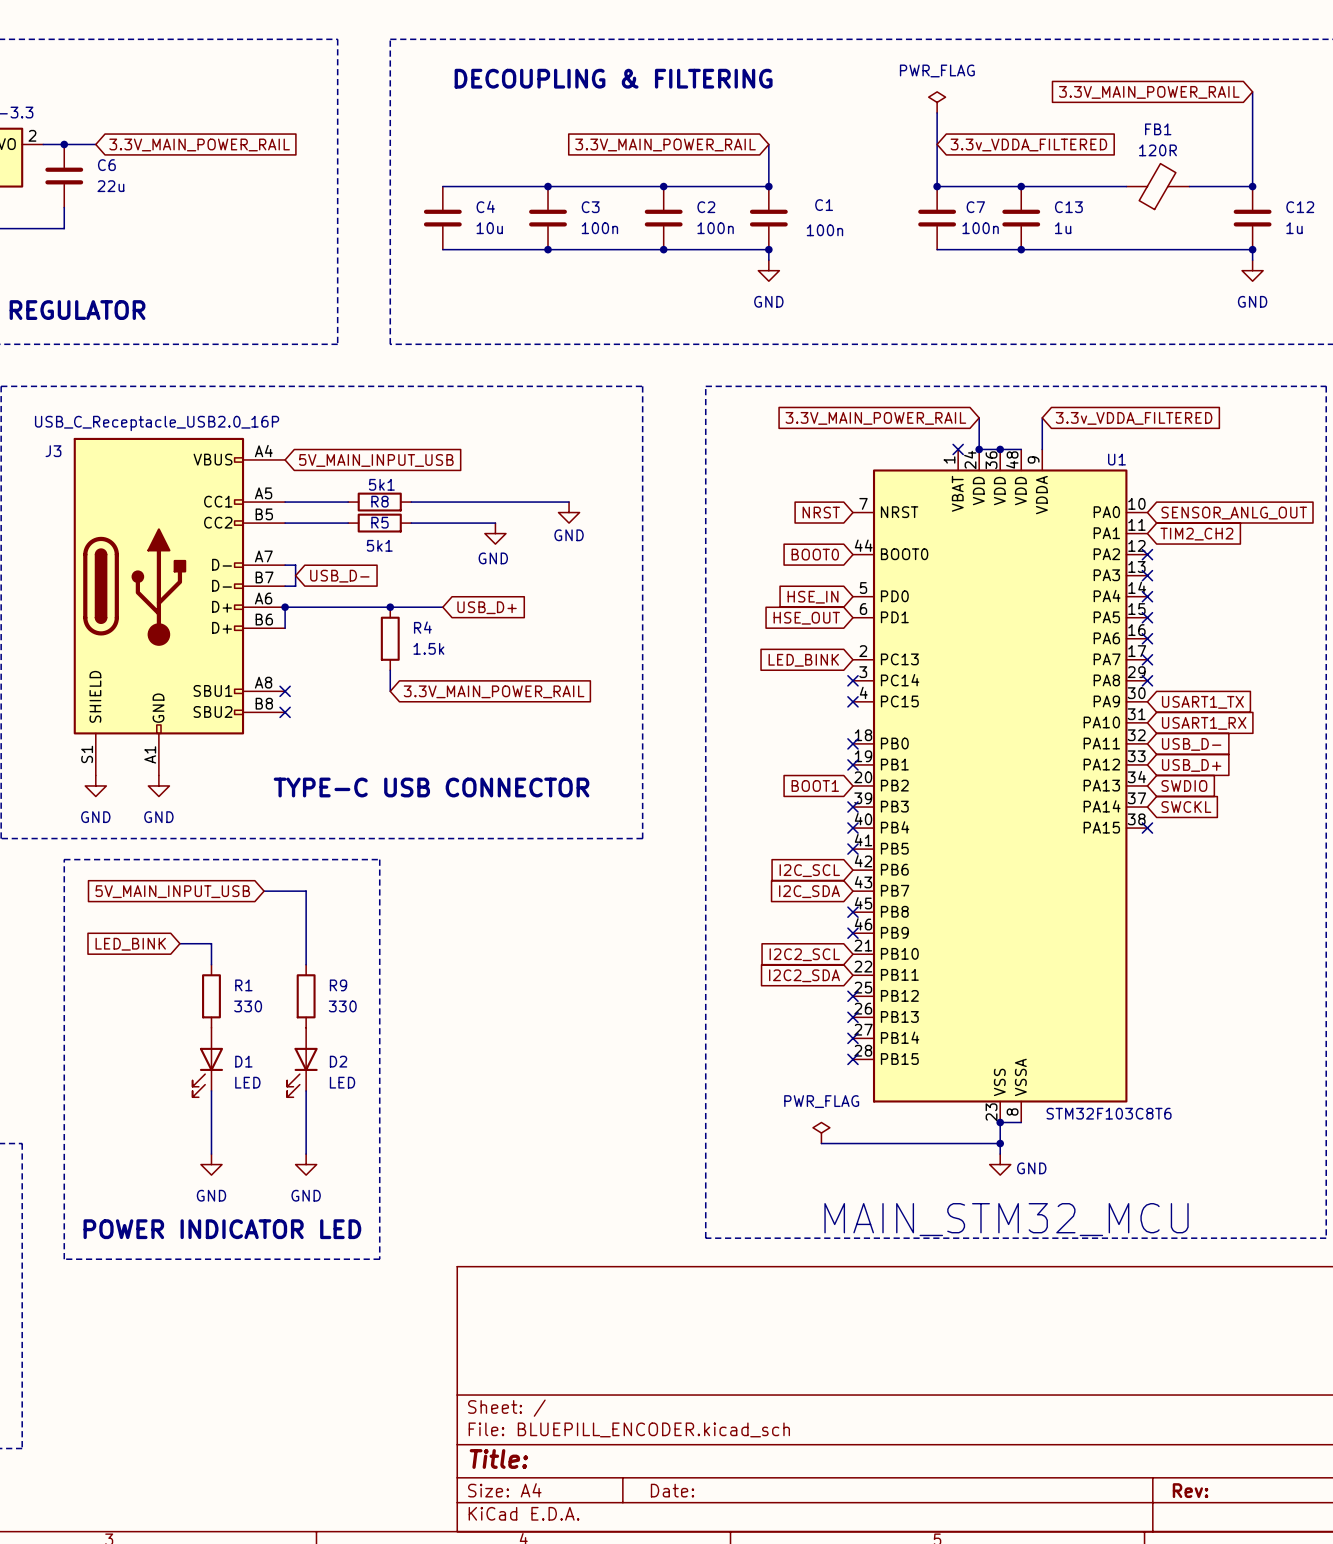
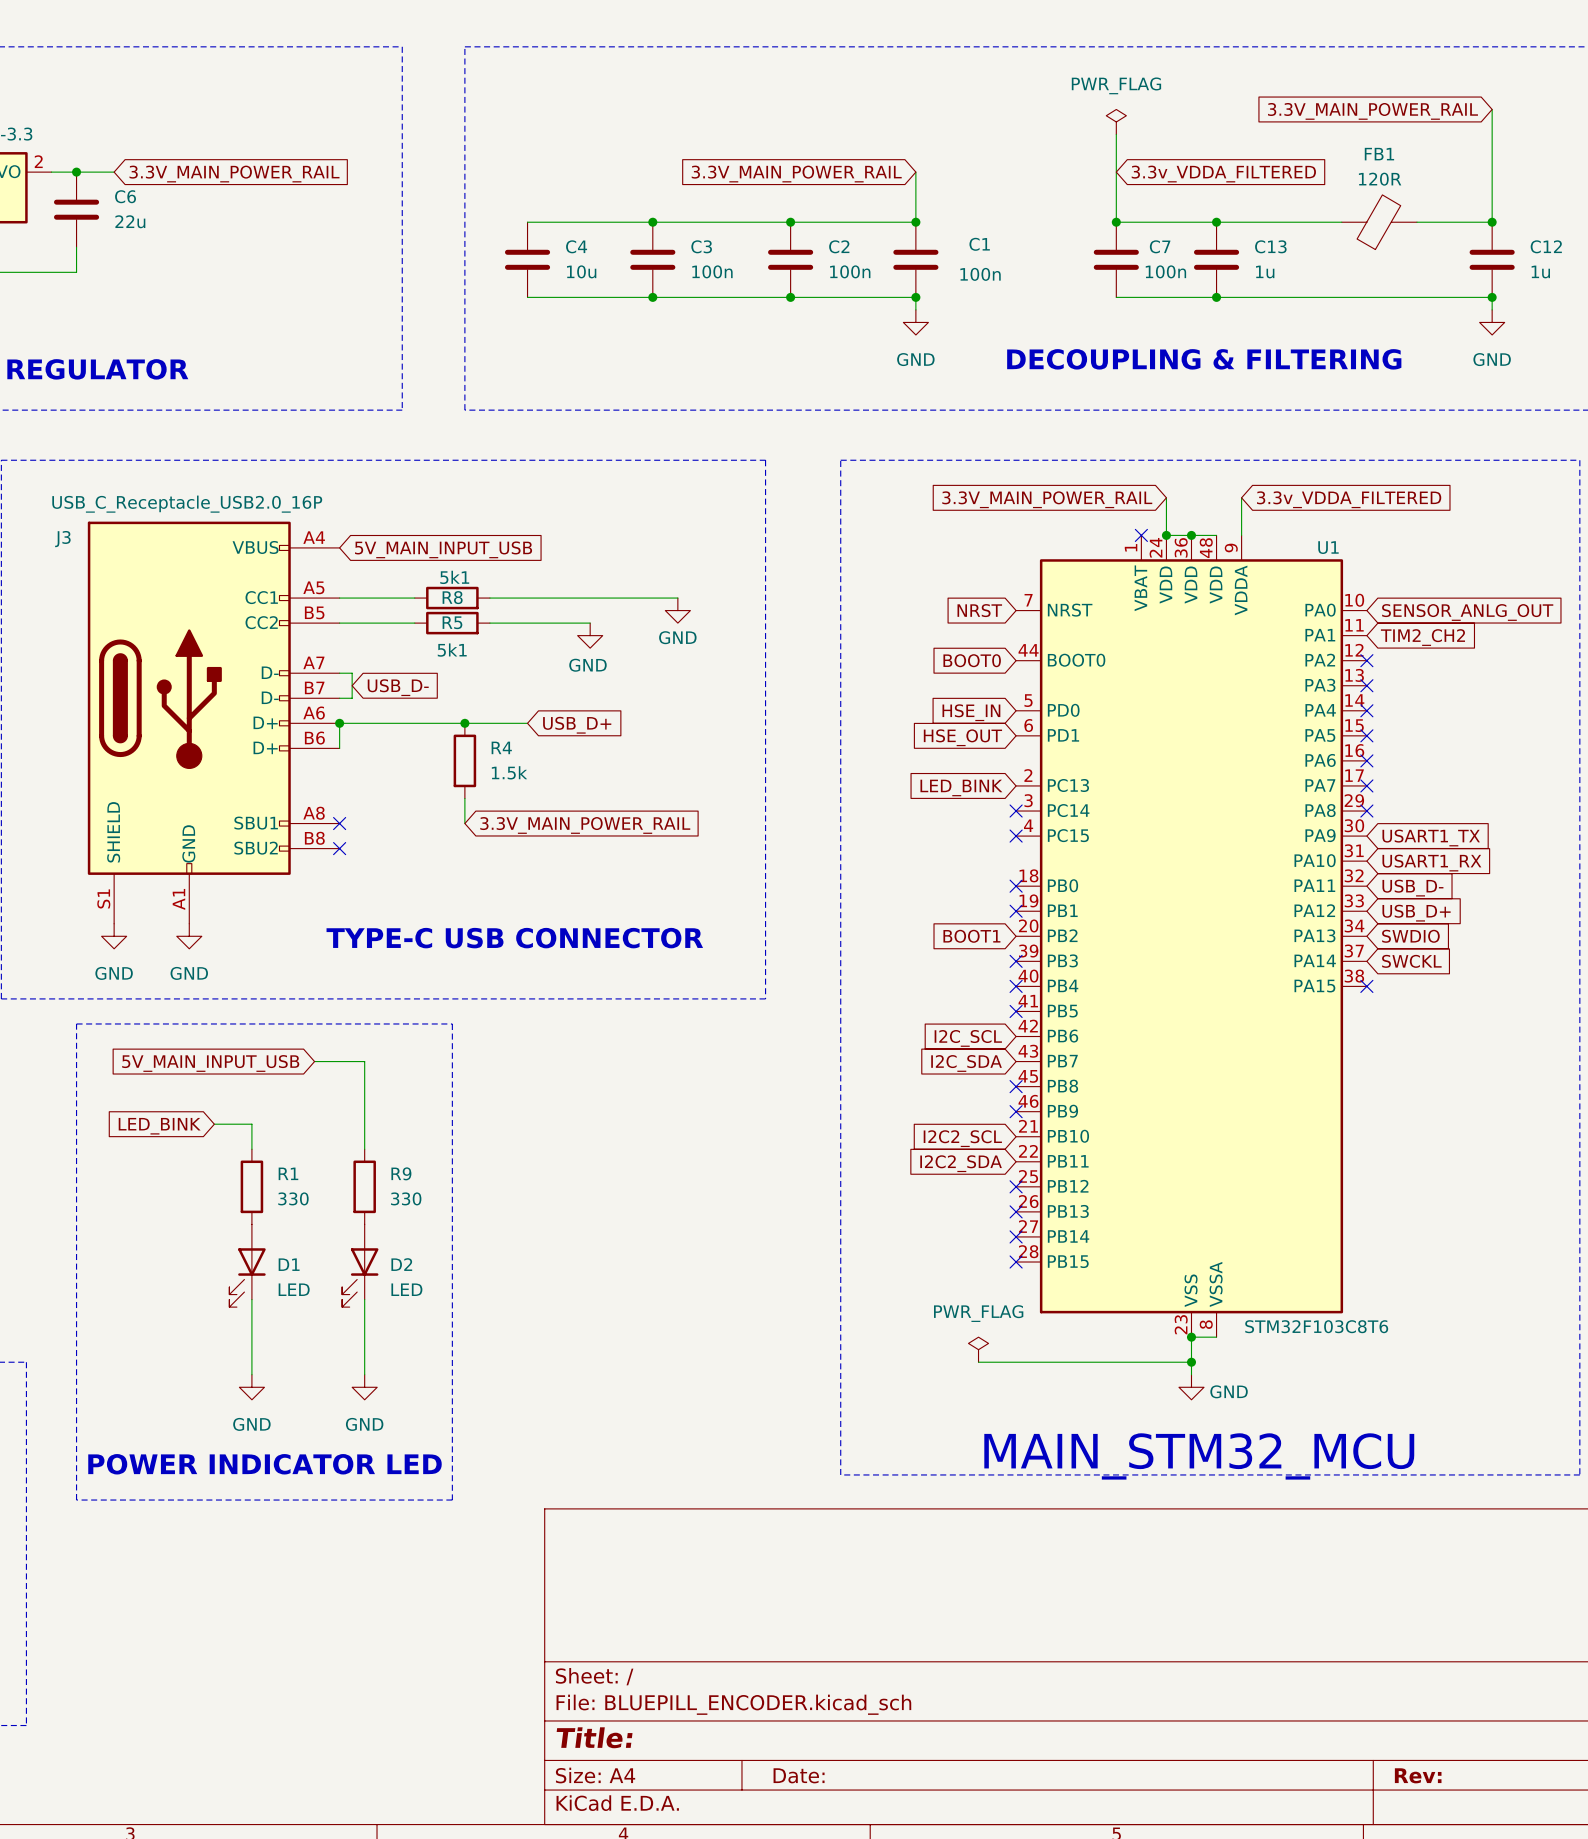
text: DECOUPLING & FILTERING (613, 78) -> none
text: none -> DECOUPLING & FILTERING (1204, 359)

